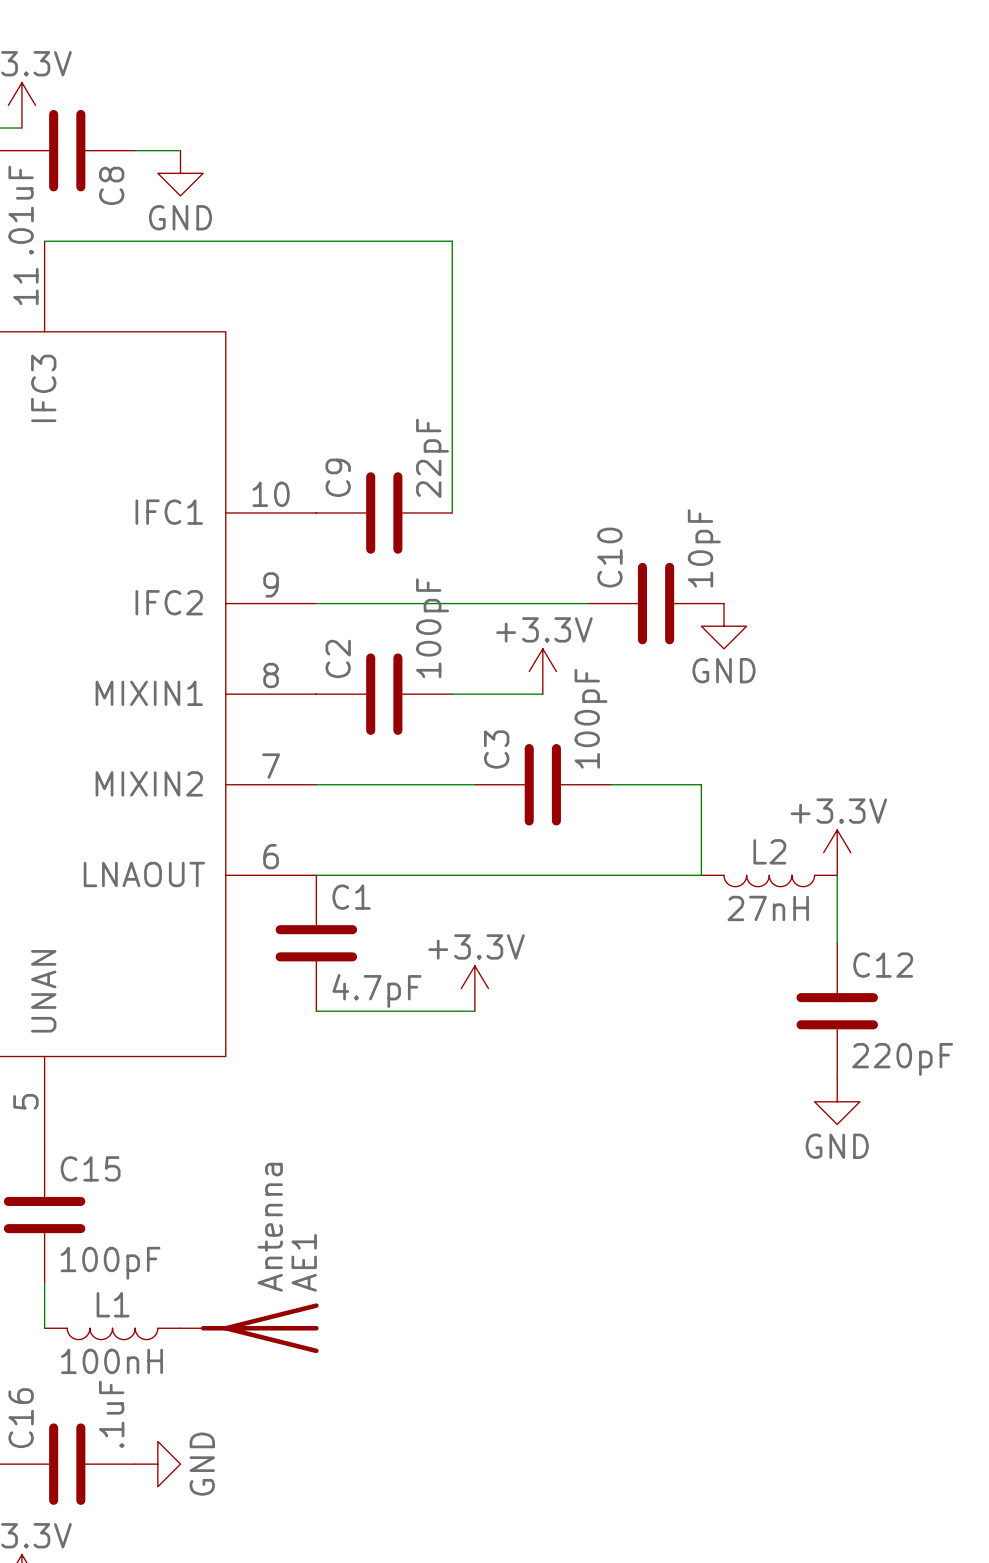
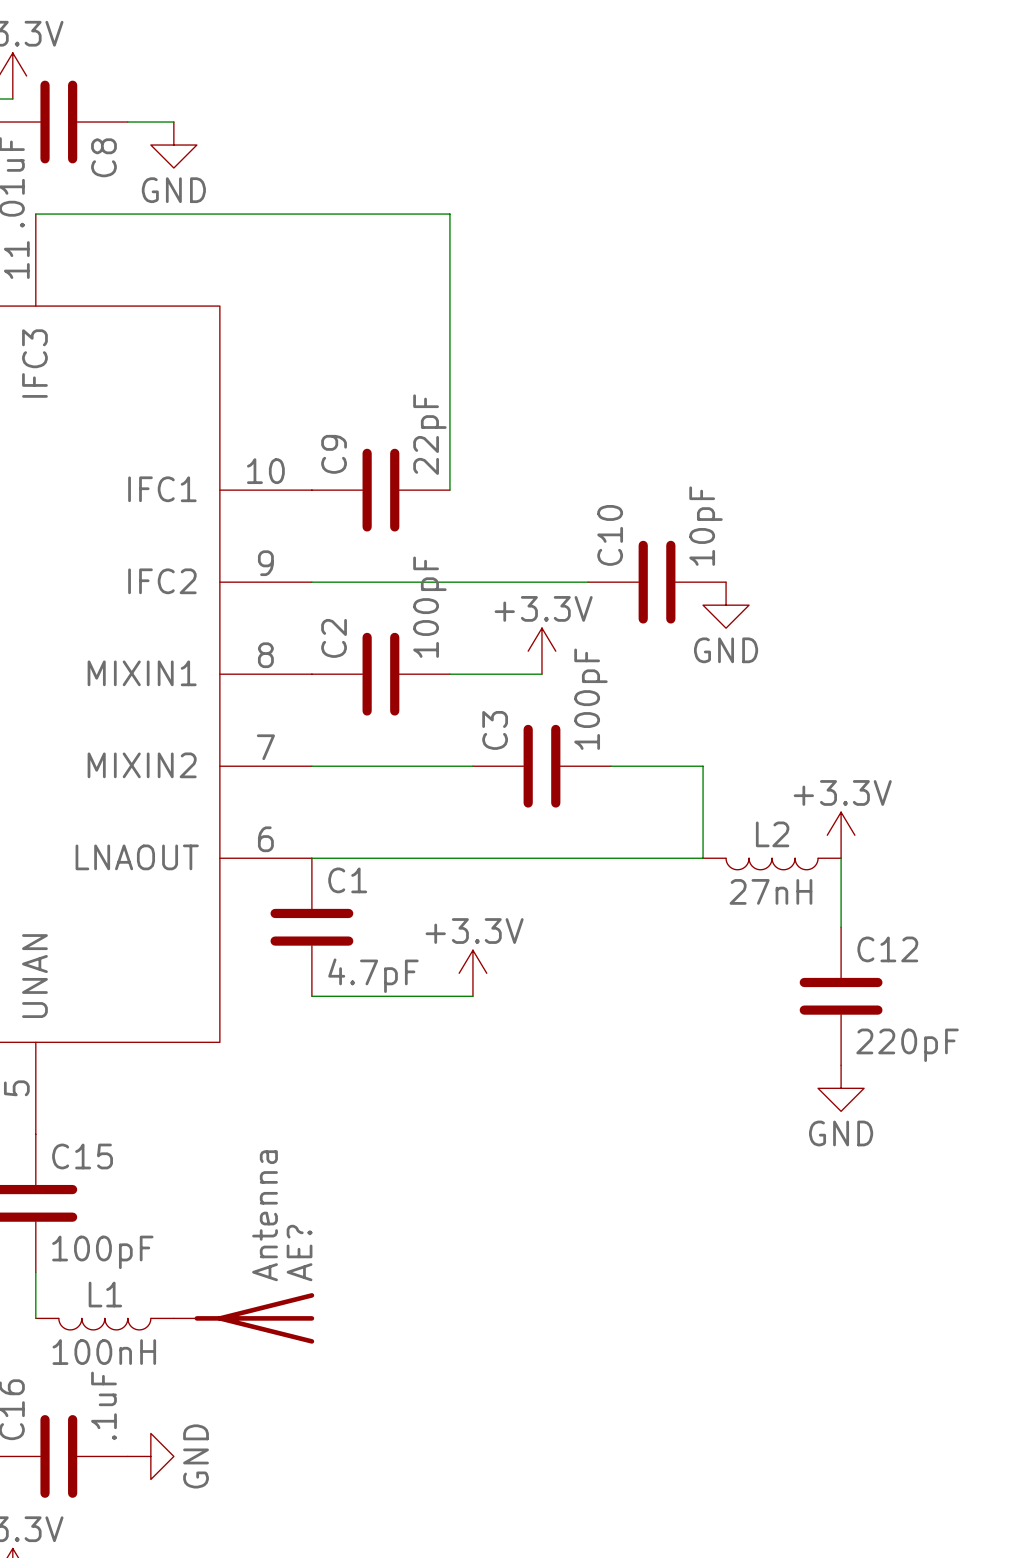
AE1 name: AE1 (304, 1262) -> AE? (299, 1253)

